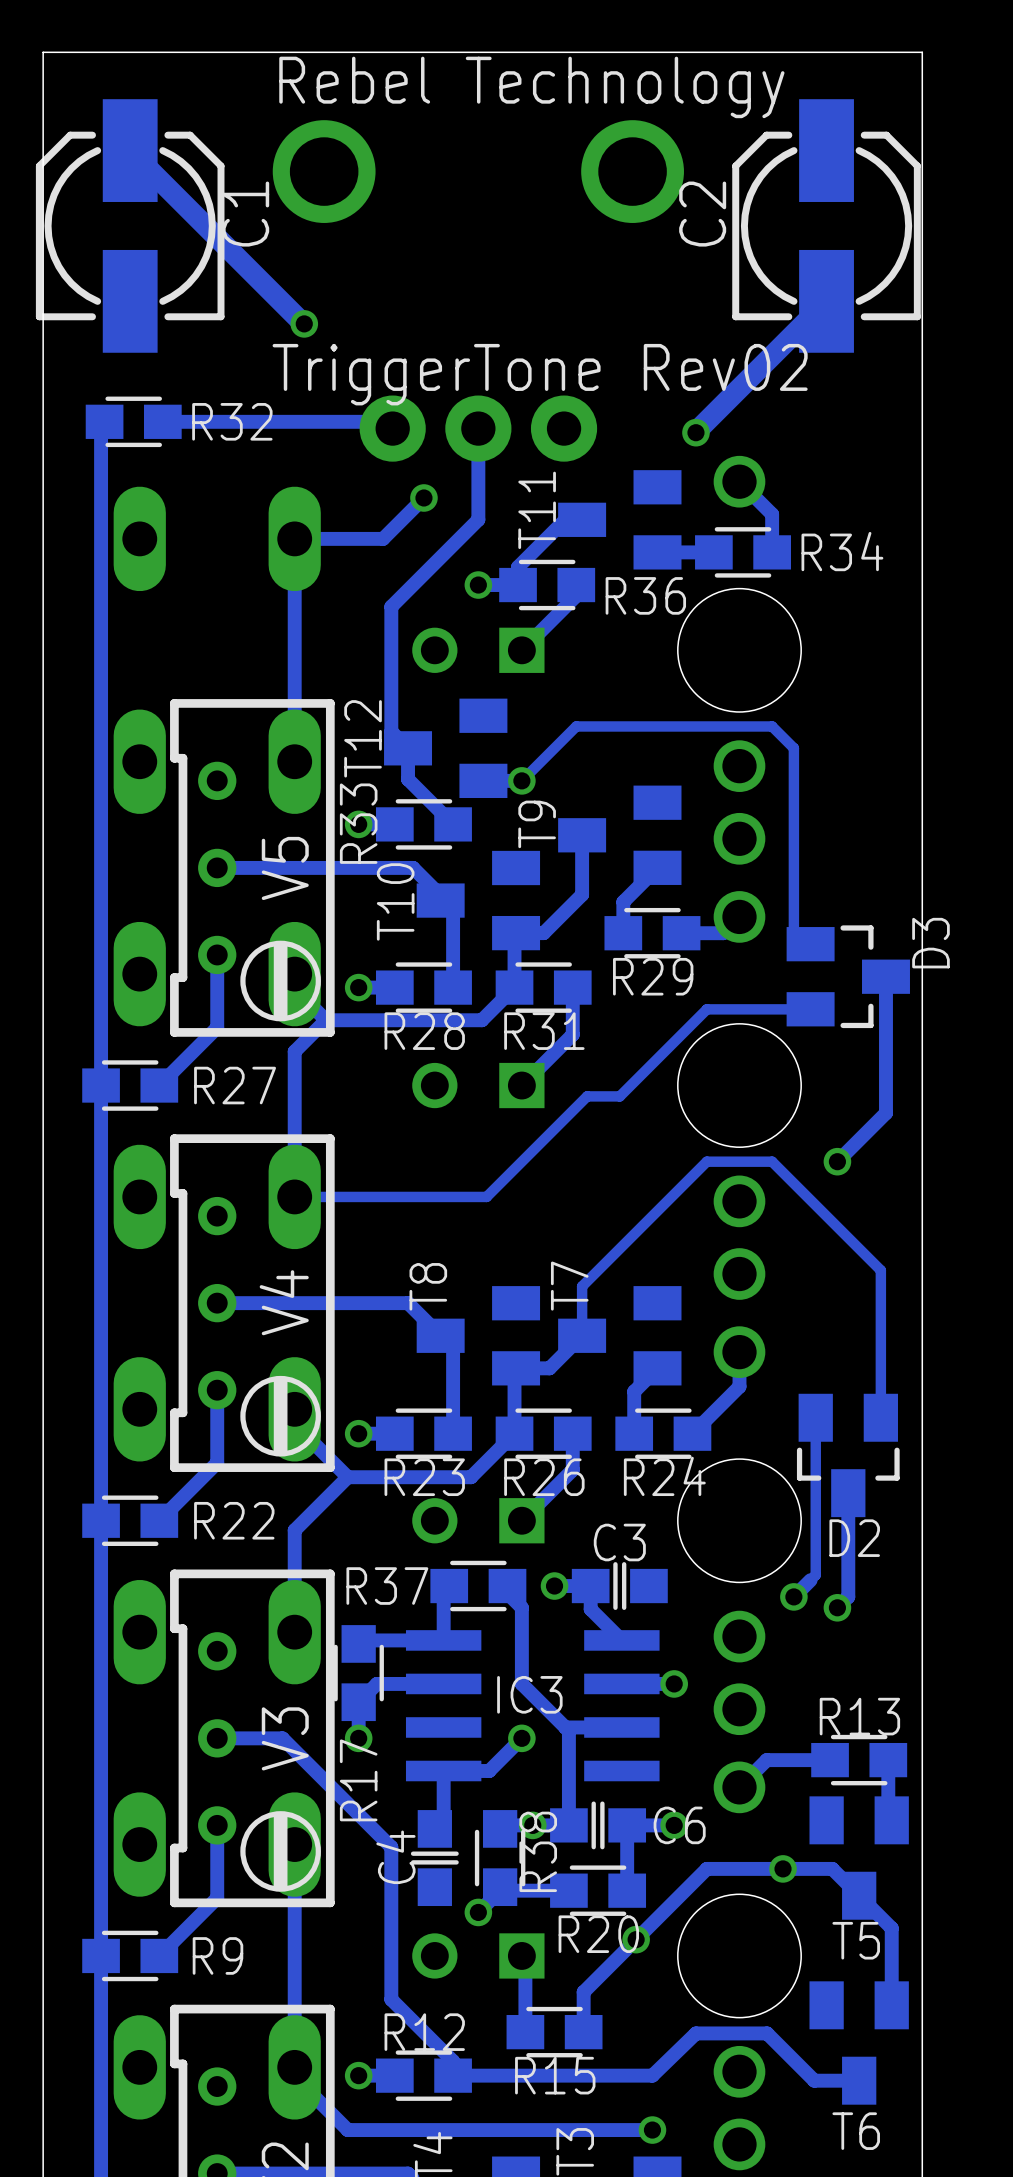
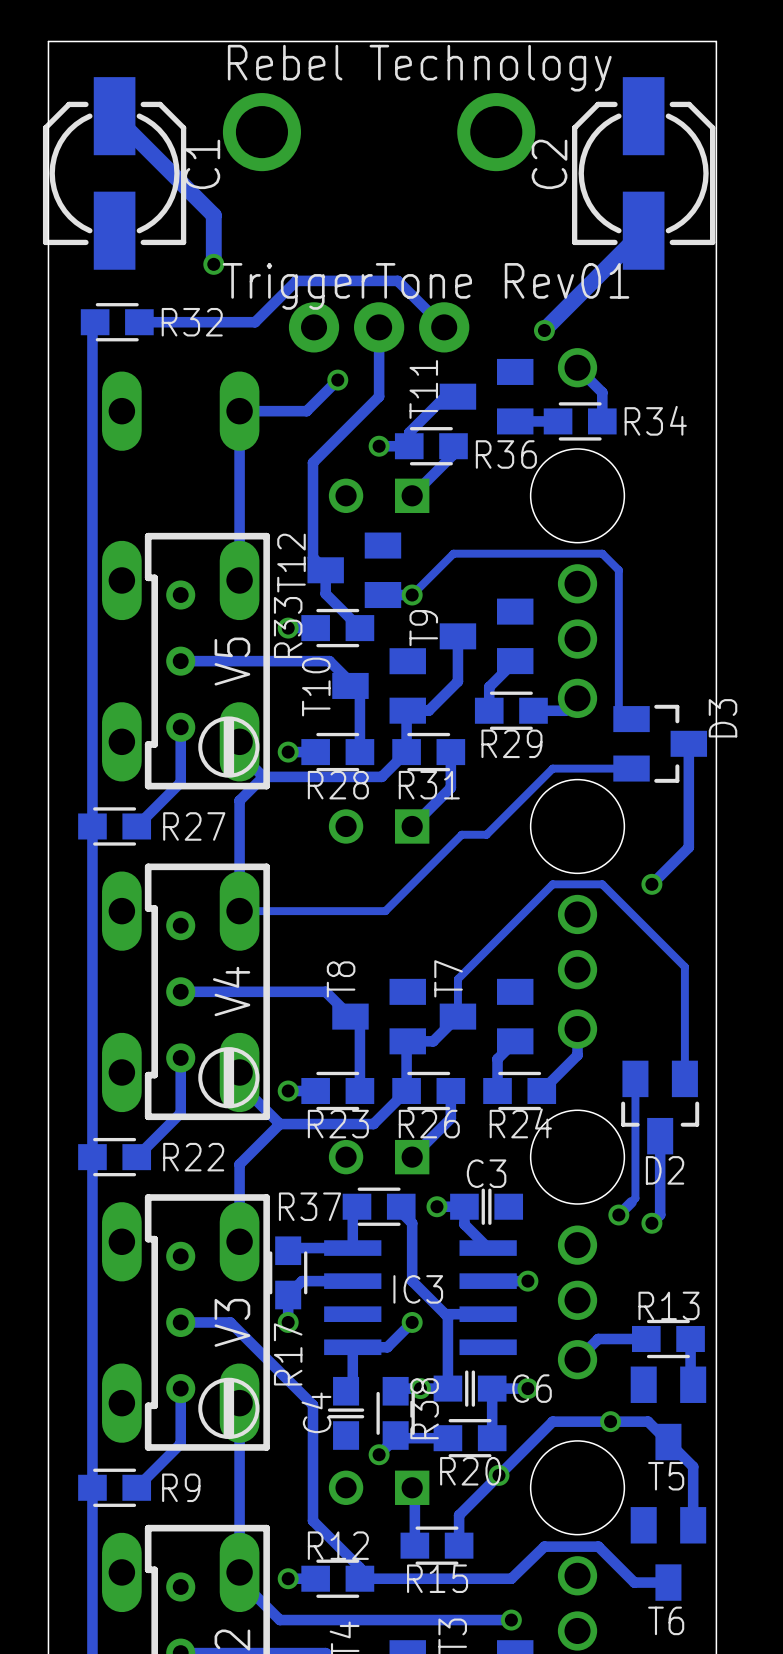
track: (260, 281) (304, 323) -> (213, 215) (213, 264)
via position: (304, 323) -> (213, 264)
text: TriggerTone Rev02 (540, 374) -> TriggerTone Rev01 (426, 286)
track: (315, 421) (385, 421) (392, 428) -> (255, 322) (296, 280) (397, 280) (444, 327)

